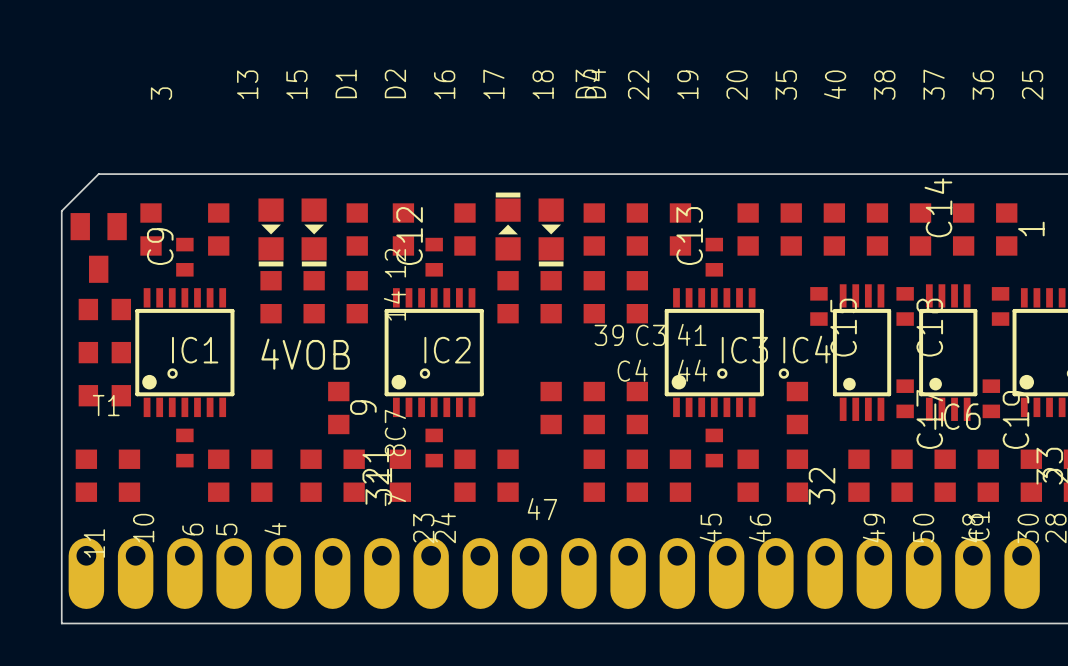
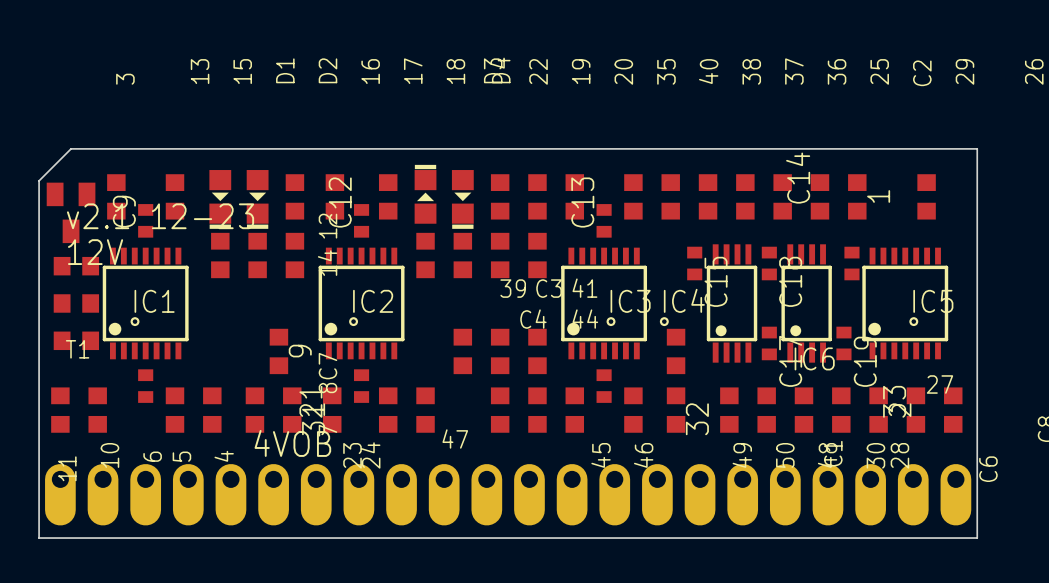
text: none -> v2.1 12-23 (160, 216)
text: none -> 12V (95, 252)
text position: 4VOB (305, 354) -> 4VOB (292, 443)

